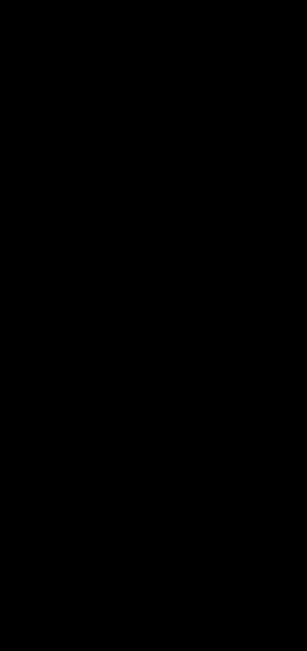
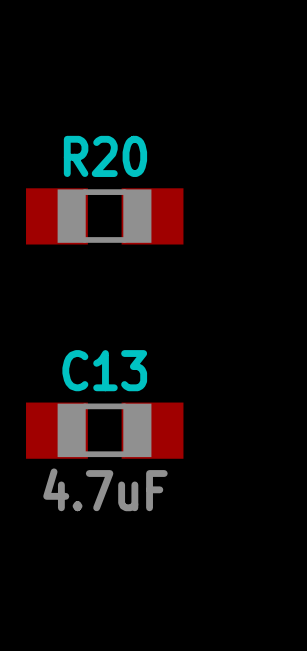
R20: none -> (104, 216)
C13: none -> 4.7uF (104, 430)

